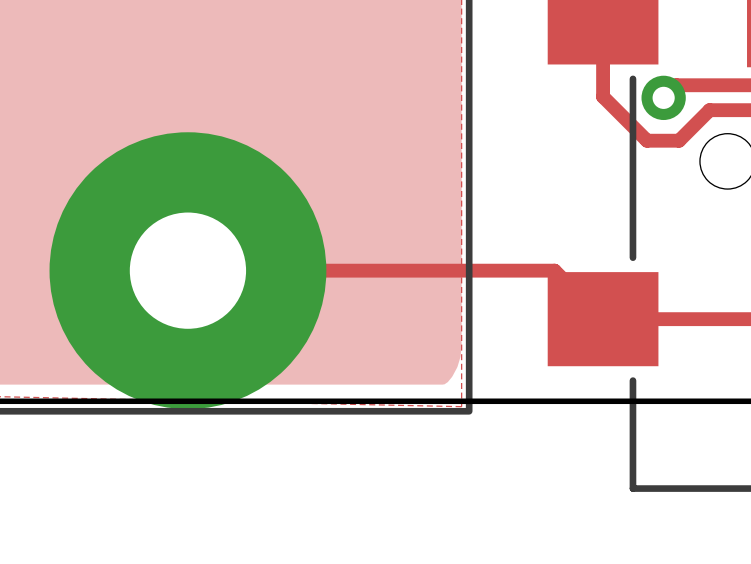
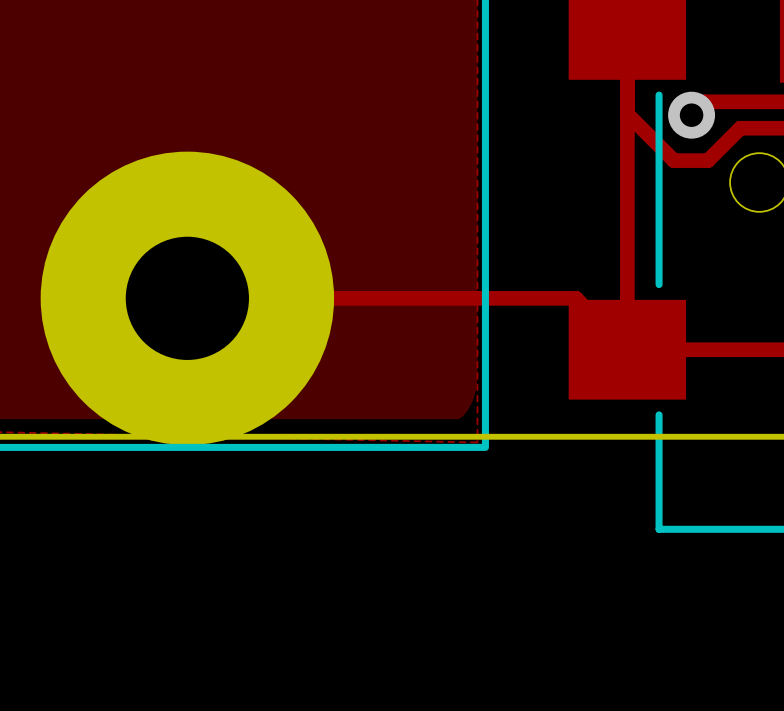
track: none -> (627, 114) (627, 349)

